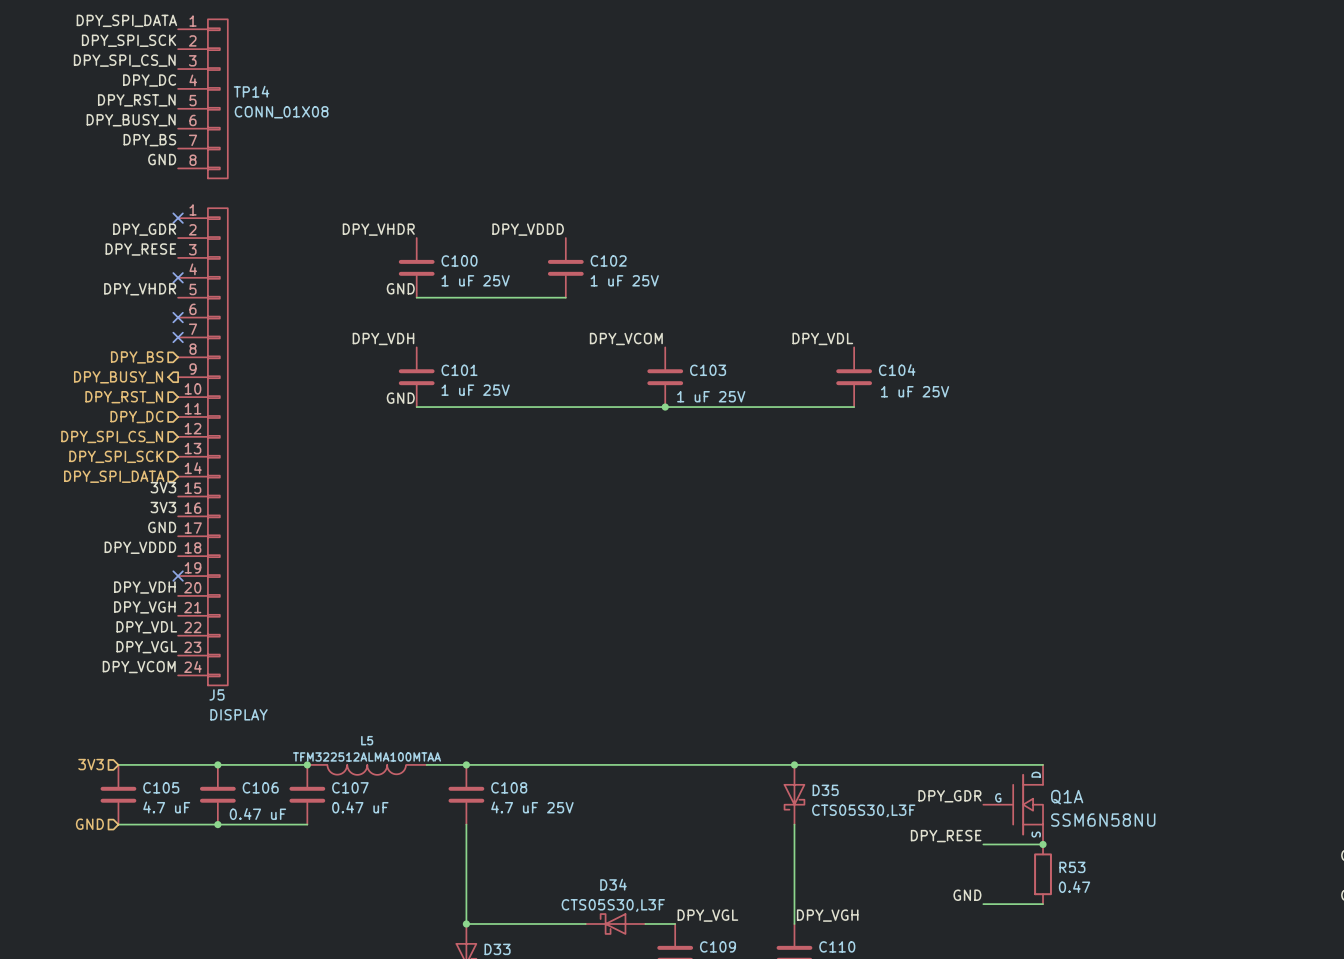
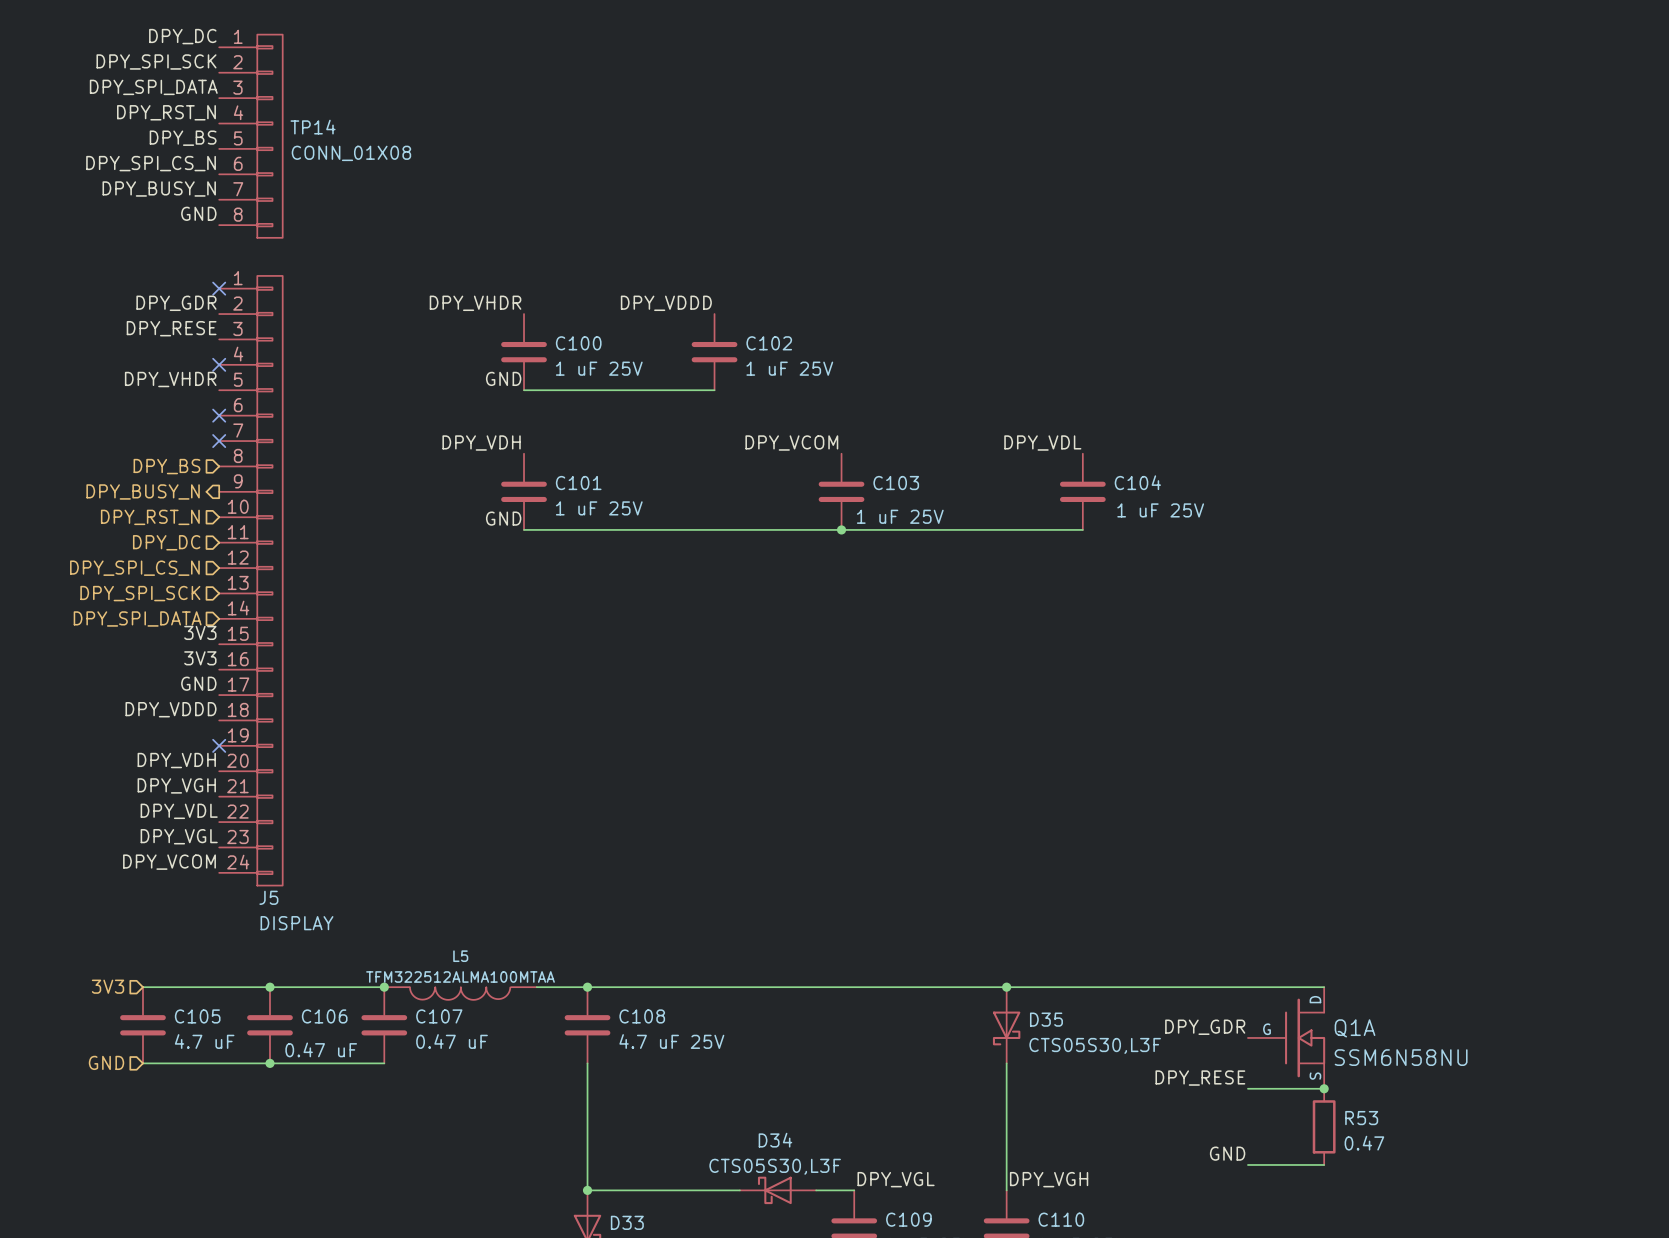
label: DPY_SPI_DATA (126, 20) -> DPY_DC (182, 36)
label: DPY_SPI_CS_N (124, 60) -> DPY_SPI_DATA (153, 87)
label: DPY_DC (149, 80) -> DPY_RST_N (166, 112)
label: DPY_RST_N (136, 100) -> DPY_BS (183, 138)
label: DPY_BUSY_N (131, 120) -> DPY_SPI_CS_N (151, 163)
label: DPY_BS (149, 140) -> DPY_BUSY_N (159, 189)

